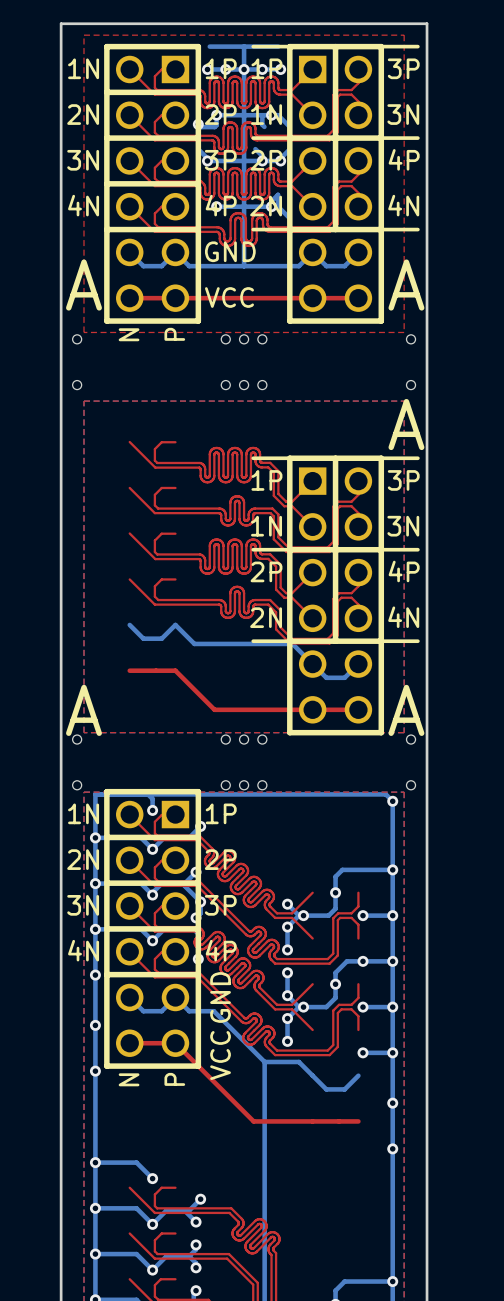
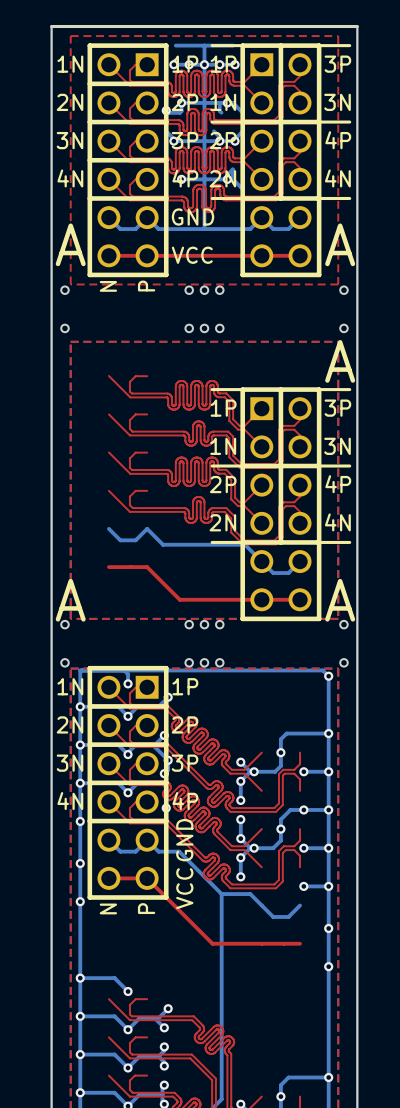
line: none -> (51, 26) (357, 26)

